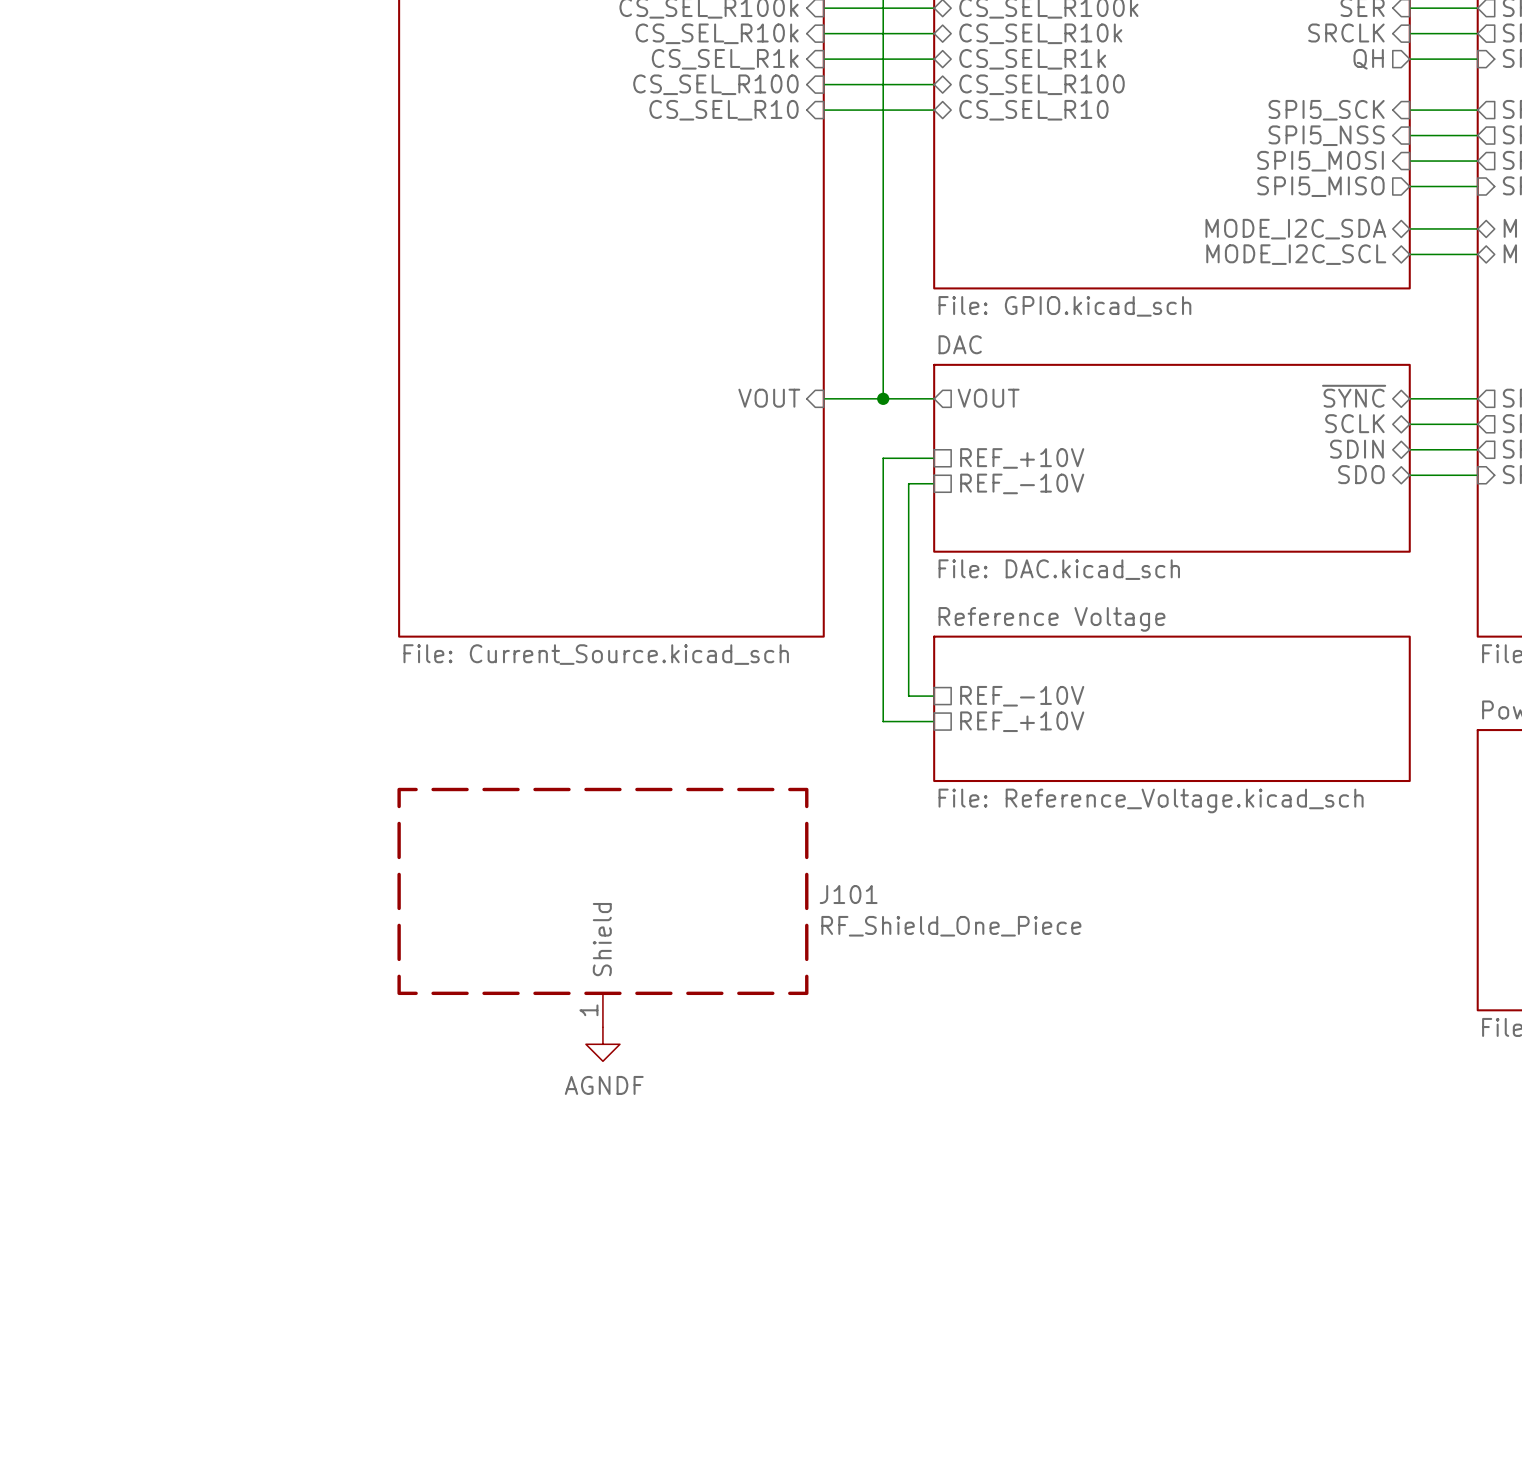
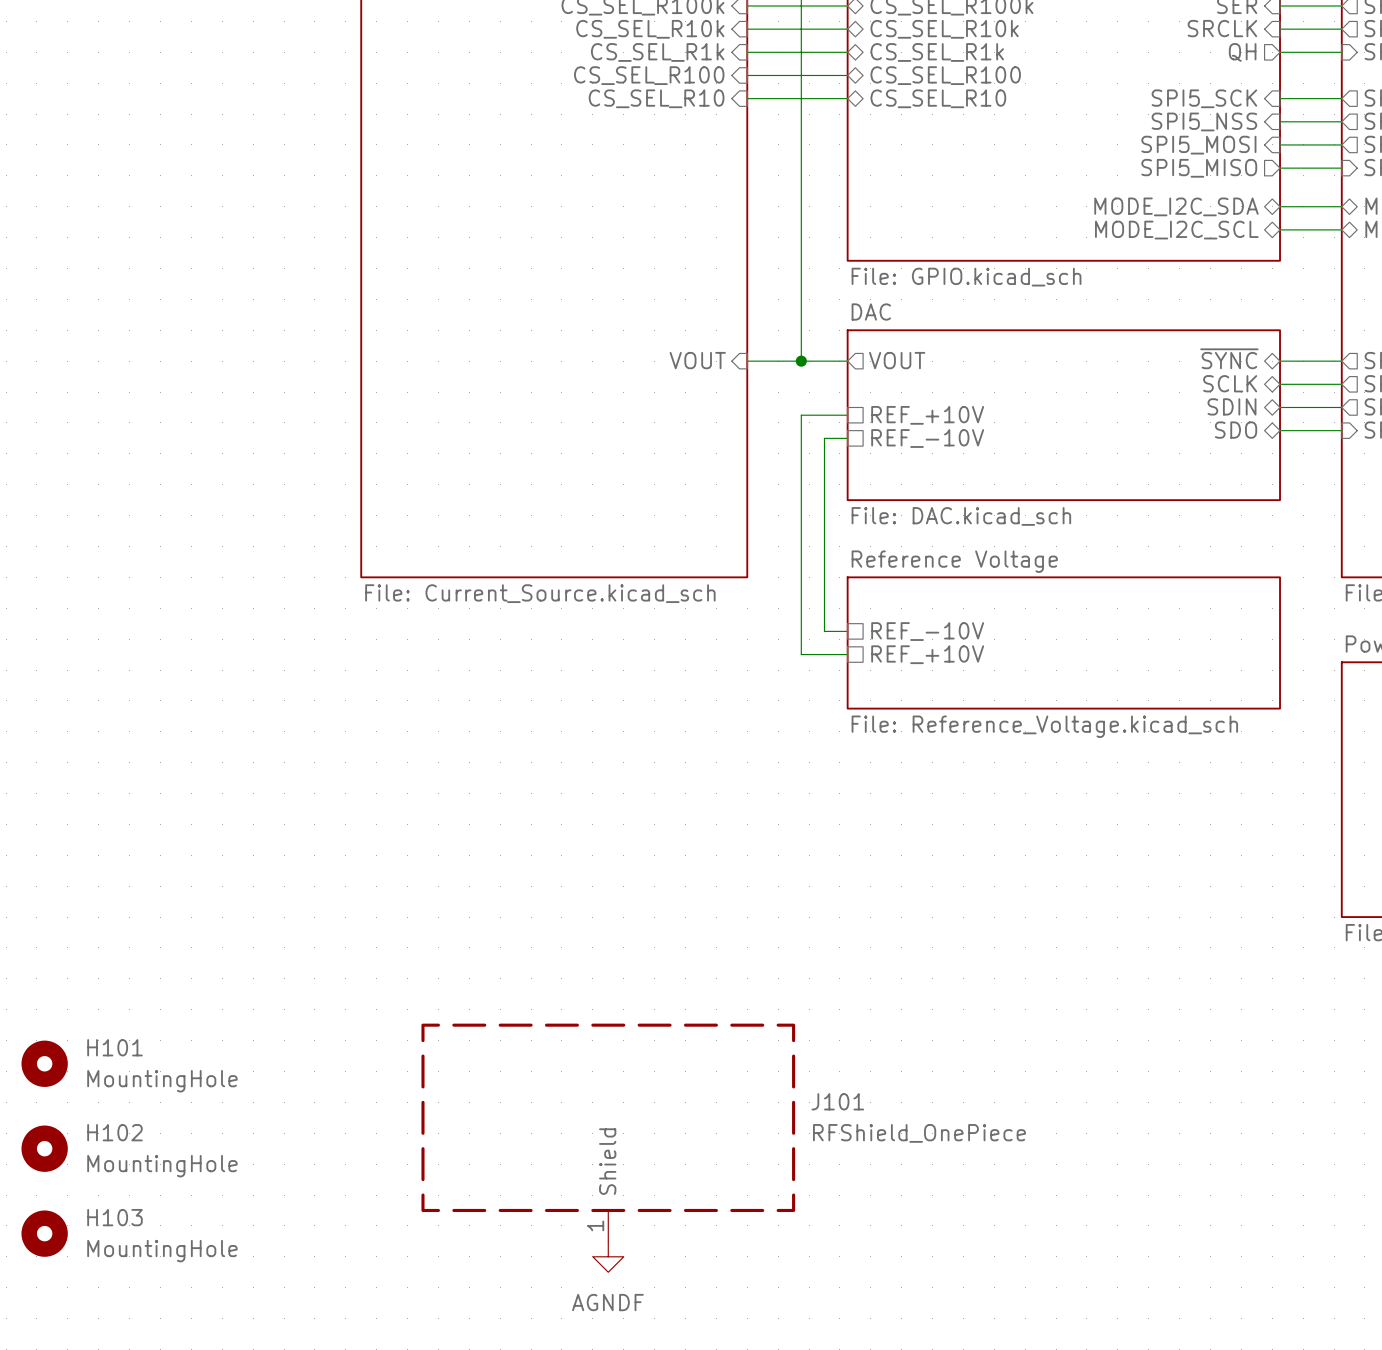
J101 name position: J101 (848, 894) -> J101 (837, 1101)
J101 position: (602, 907) -> (608, 1132)
J101 value: RF_Shield_One_Piece (951, 926) -> RFShield_OnePiece (919, 1133)
power symbol: AGNDF (602, 1044) -> none
H101: none -> MountingHole (44, 1063)
H102: none -> MountingHole (44, 1148)
H103: none -> MountingHole (44, 1233)
power symbol: none -> AGNDF (608, 1256)

